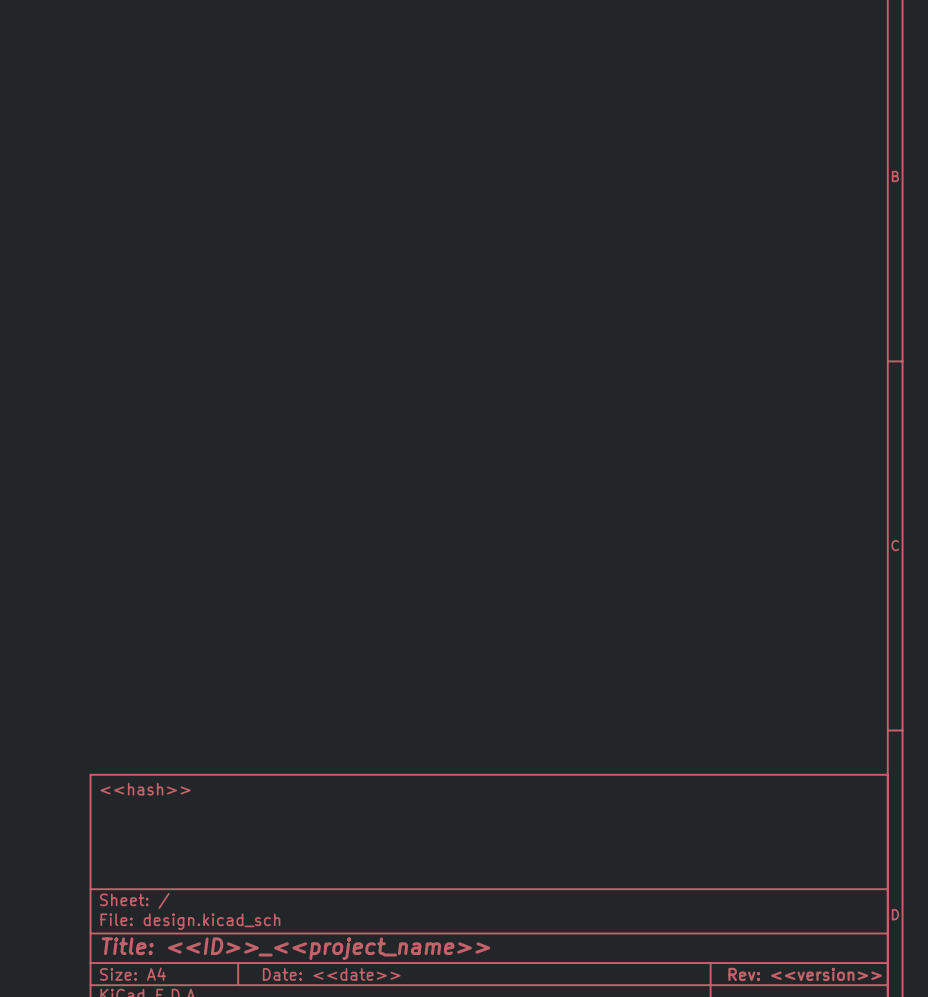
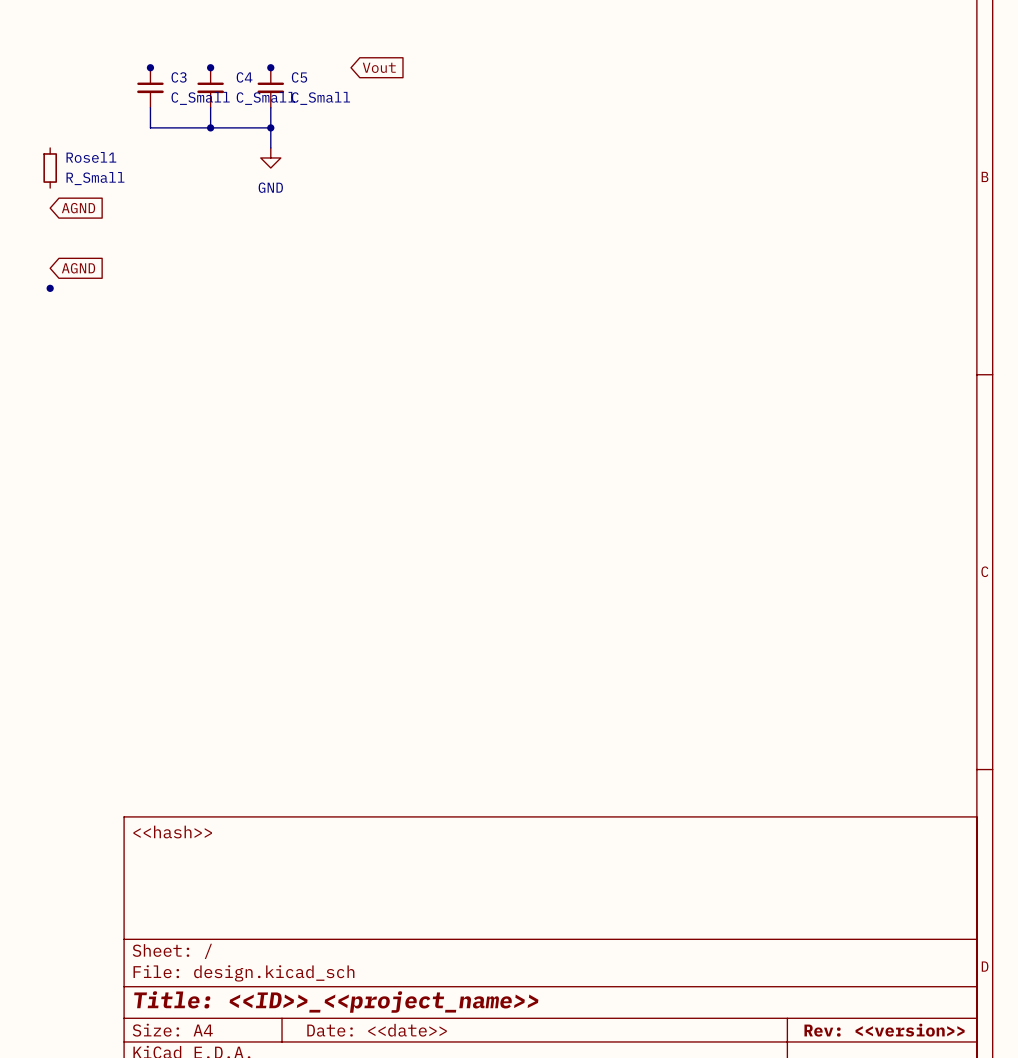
junction: none -> (150, 67)
junction: none -> (210, 67)
junction: none -> (270, 67)
global label: none -> Vout (379, 67)
C3: none -> C_Small (150, 87)
C4: none -> C_Small (210, 87)
C5: none -> C_Small (270, 87)
wire: none -> (150, 107) (150, 127) (270, 127)
wire: none -> (210, 107) (210, 127)
wire: none -> (270, 107) (270, 147)
junction: none -> (210, 127)
junction: none -> (270, 127)
power symbol: none -> GND (270, 157)
Rosel1: none -> R_Small (50, 168)
global label: none -> AGND (78, 208)
global label: none -> AGND (78, 268)
junction: none -> (50, 288)

